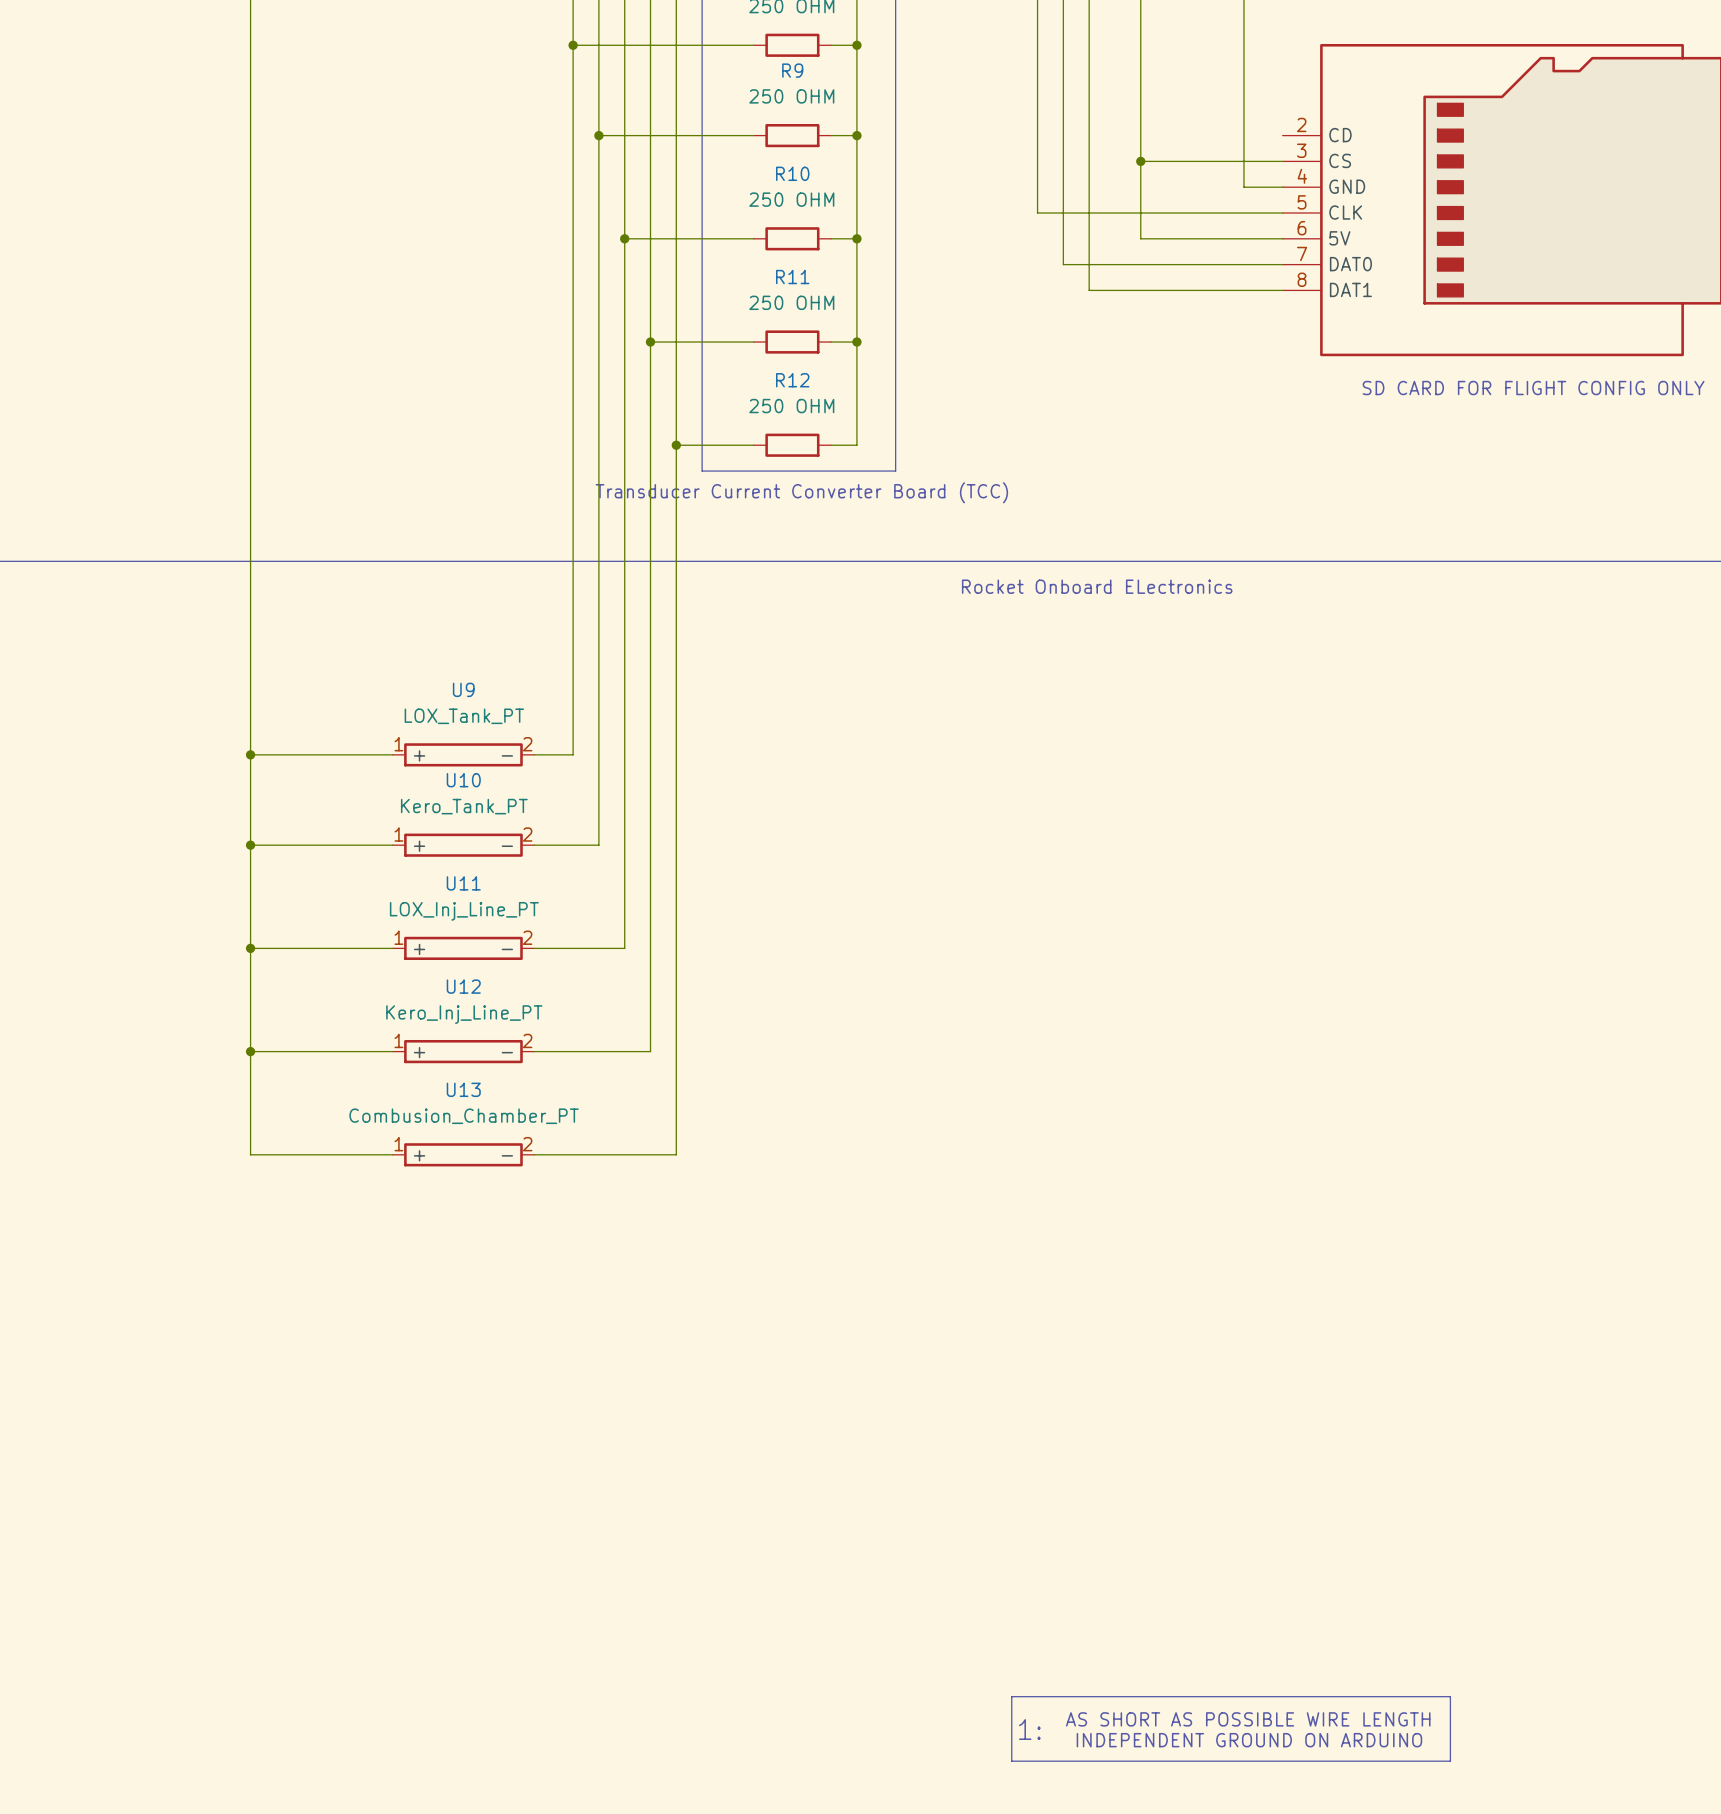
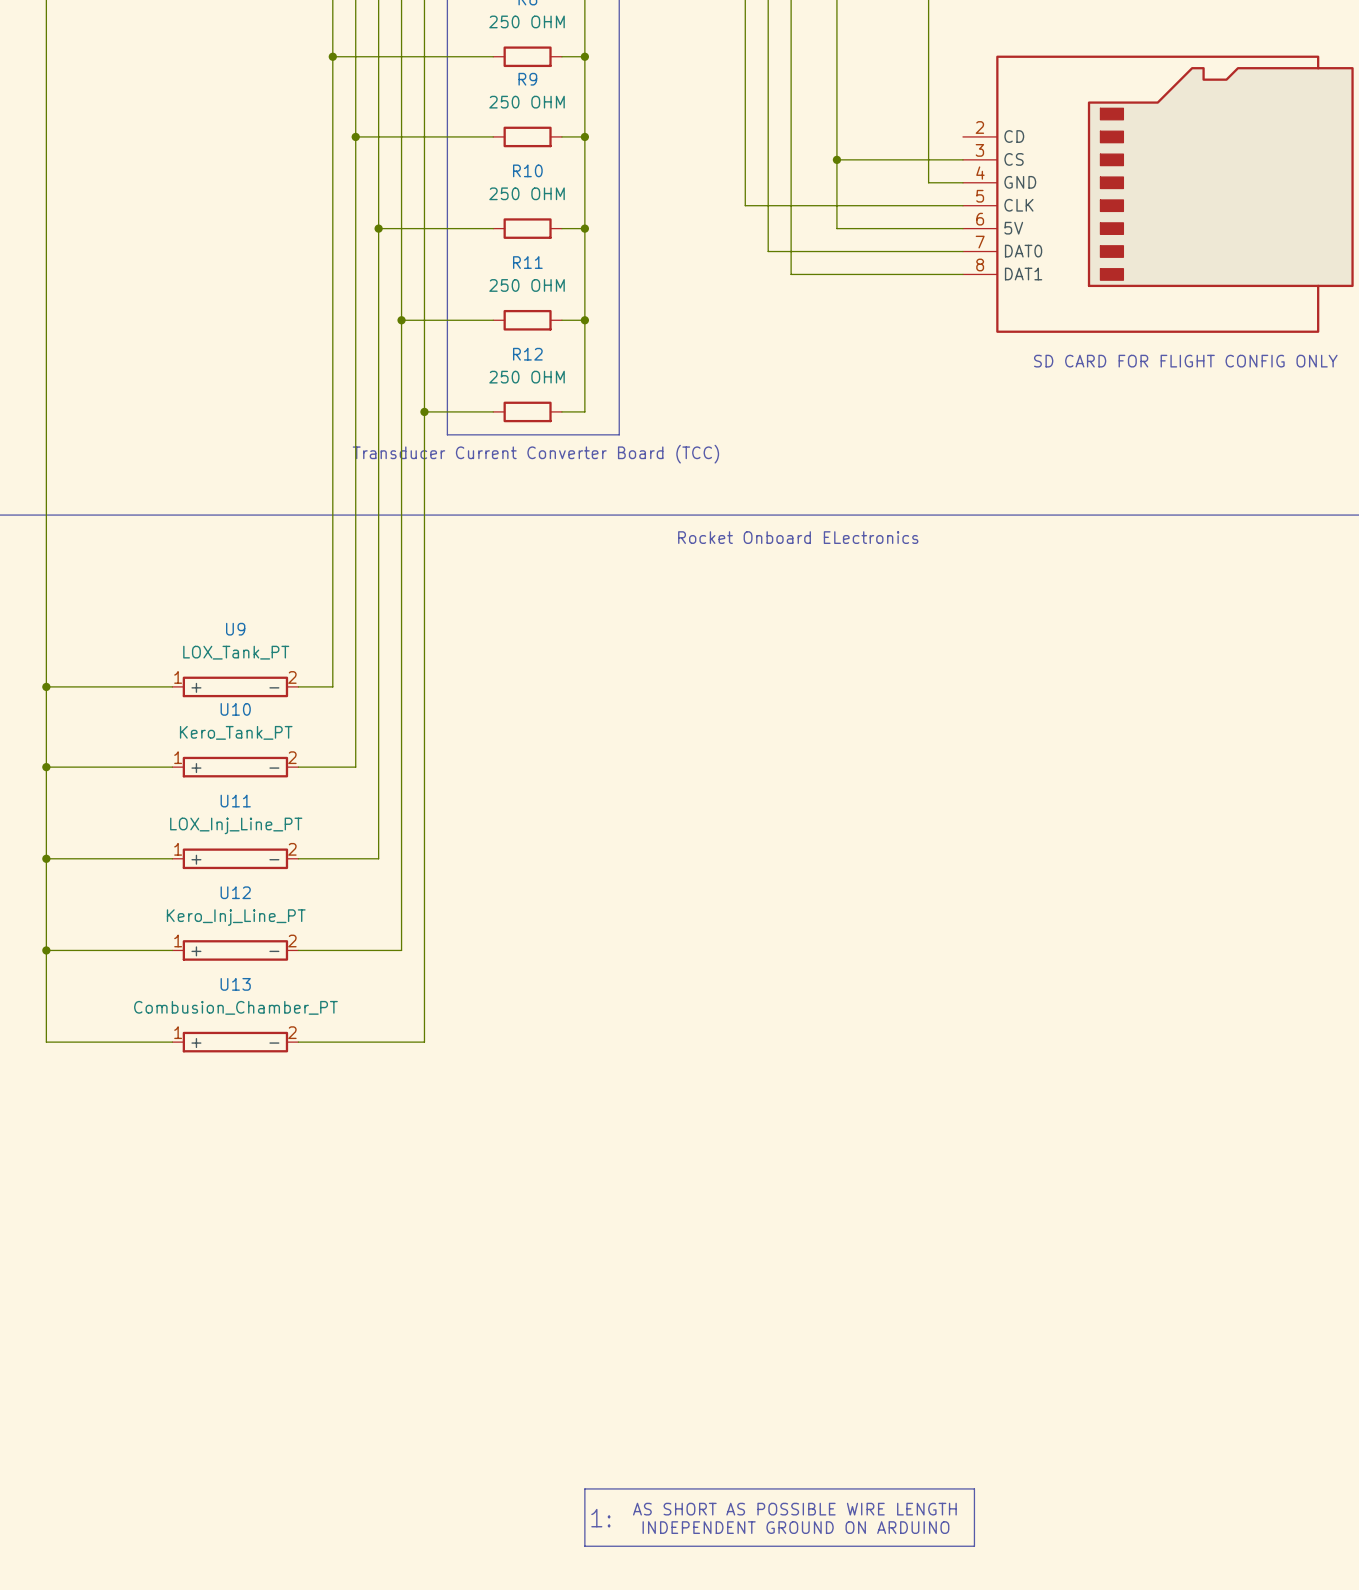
line: (1011, 1696) (1450, 1696) (1450, 1761) (1011, 1761) (1011, 1696) -> (584, 1488) (974, 1488) (974, 1546) (584, 1546) (584, 1488)
text position: AS SHORT AS POSSIBLE WIRE LENGTH (1248, 1719) -> AS SHORT AS POSSIBLE WIRE LENGTH (794, 1509)
text position: 1: (1029, 1729) -> 1: (600, 1518)
text position: INDEPENDENT GROUND ON ARDUINO (1249, 1740) -> INDEPENDENT GROUND ON ARDUINO (795, 1527)

